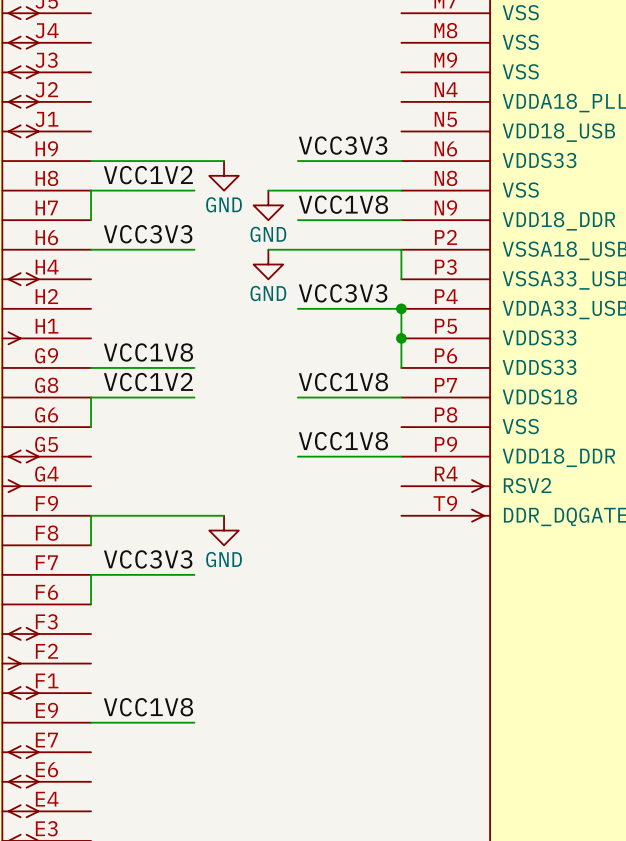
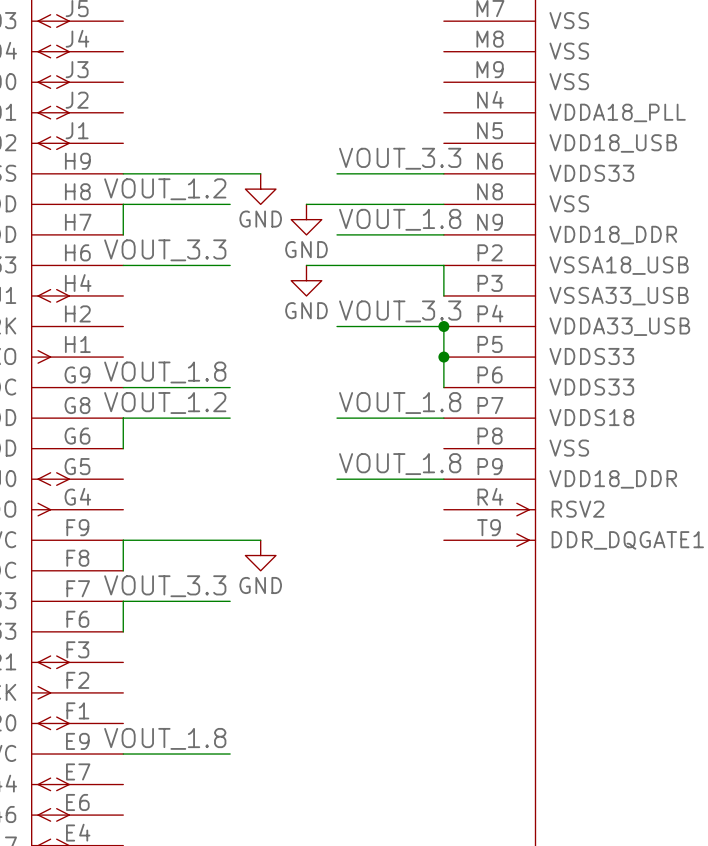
label: VCC3V3 (343, 145) -> VOUT_3.3 (400, 158)
label: VCC1V2 (148, 175) -> VOUT_1.2 (165, 189)
label: VCC1V8 (343, 204) -> VOUT_1.8 (400, 219)
label: VCC3V3 (148, 234) -> VOUT_3.3 (165, 250)
label: VCC3V3 (343, 293) -> VOUT_3.3 (400, 311)
label: VCC1V8 (148, 352) -> VOUT_1.8 (165, 372)
label: VCC1V2 (148, 382) -> VOUT_1.2 (165, 403)
label: VCC1V8 (343, 382) -> VOUT_1.8 (400, 403)
label: VCC1V8 (343, 441) -> VOUT_1.8 (400, 464)
label: VCC3V3 (148, 559) -> VOUT_3.3 (165, 586)
label: VCC1V8 (148, 707) -> VOUT_1.8 (165, 738)

